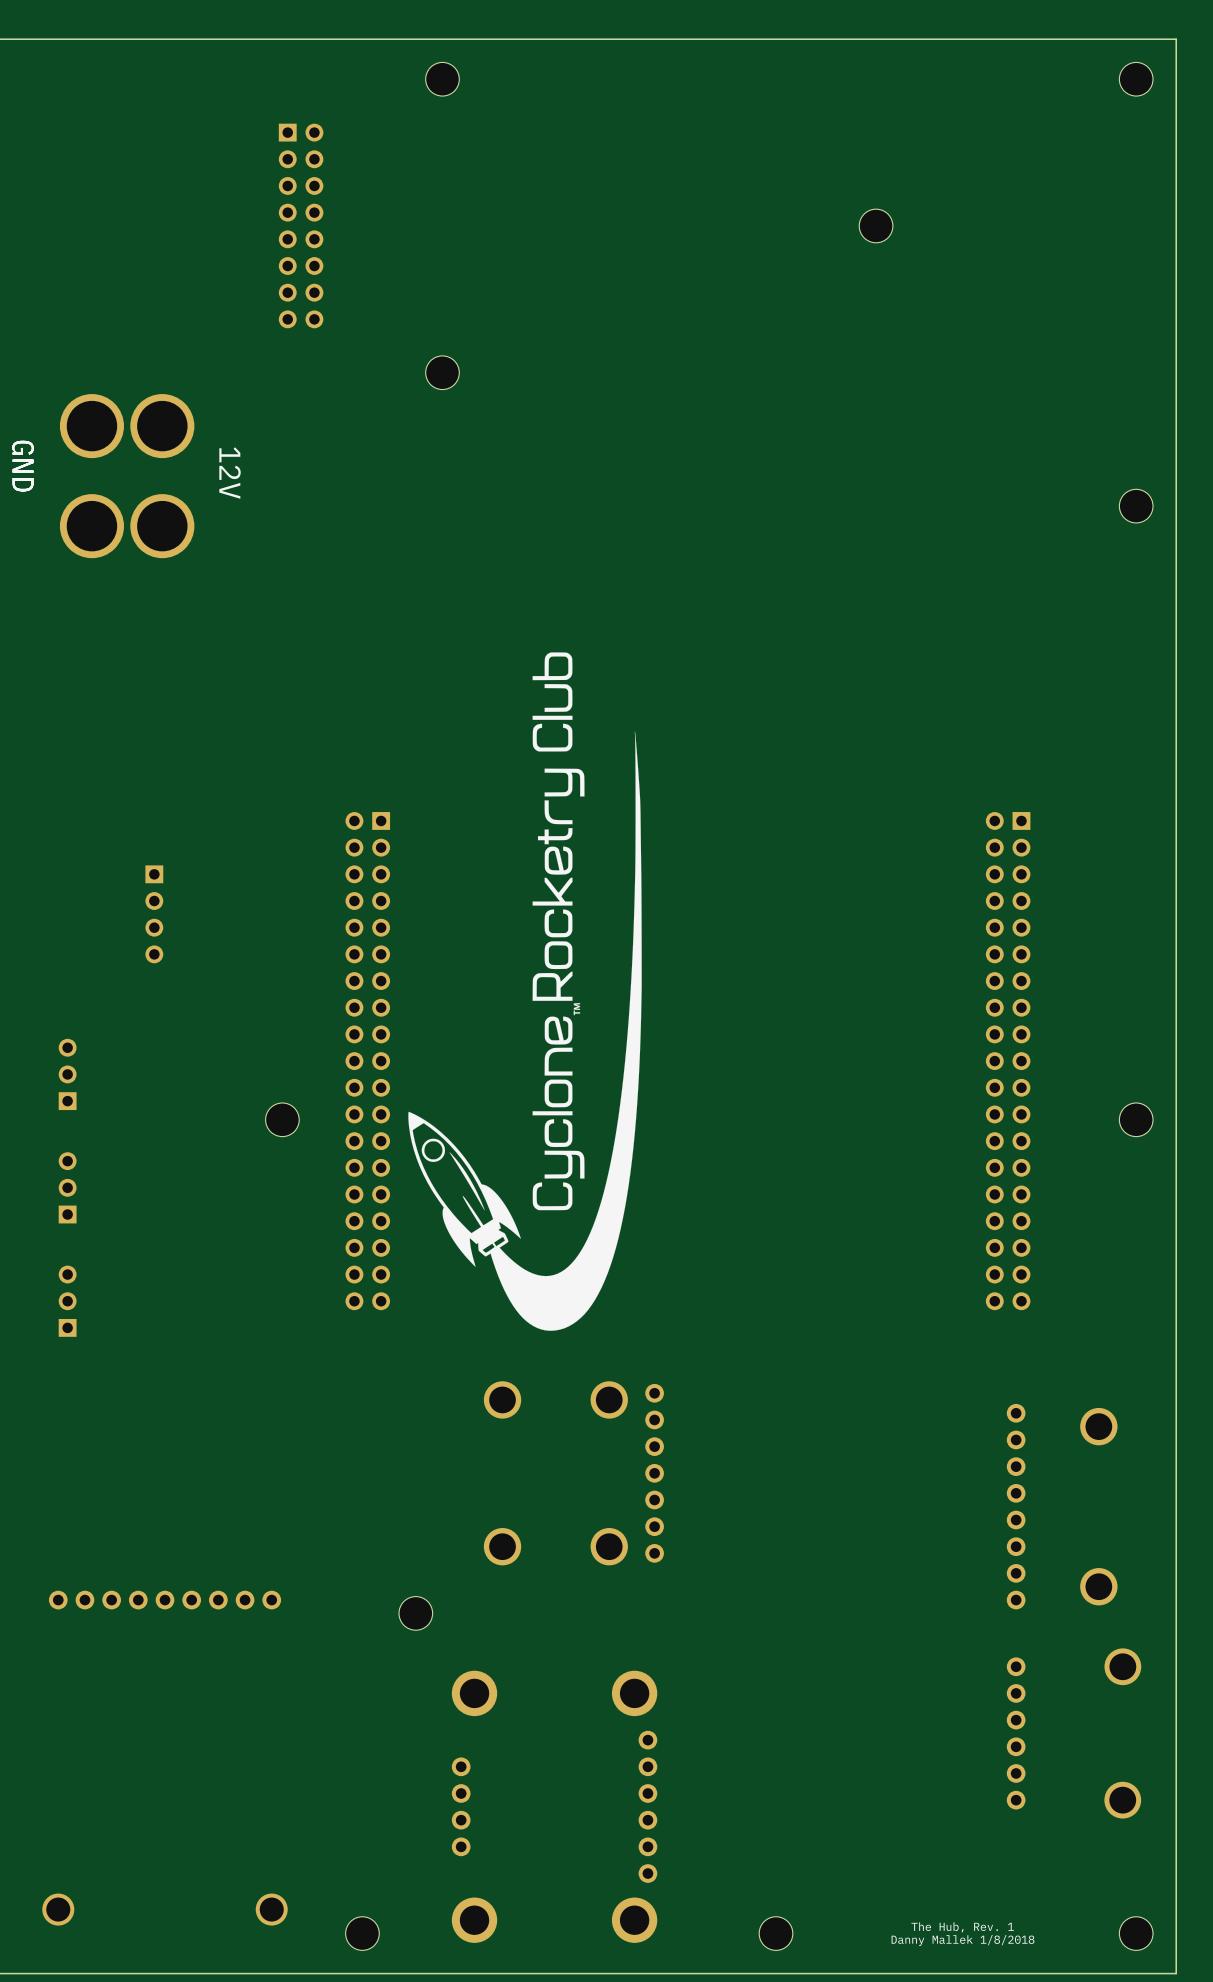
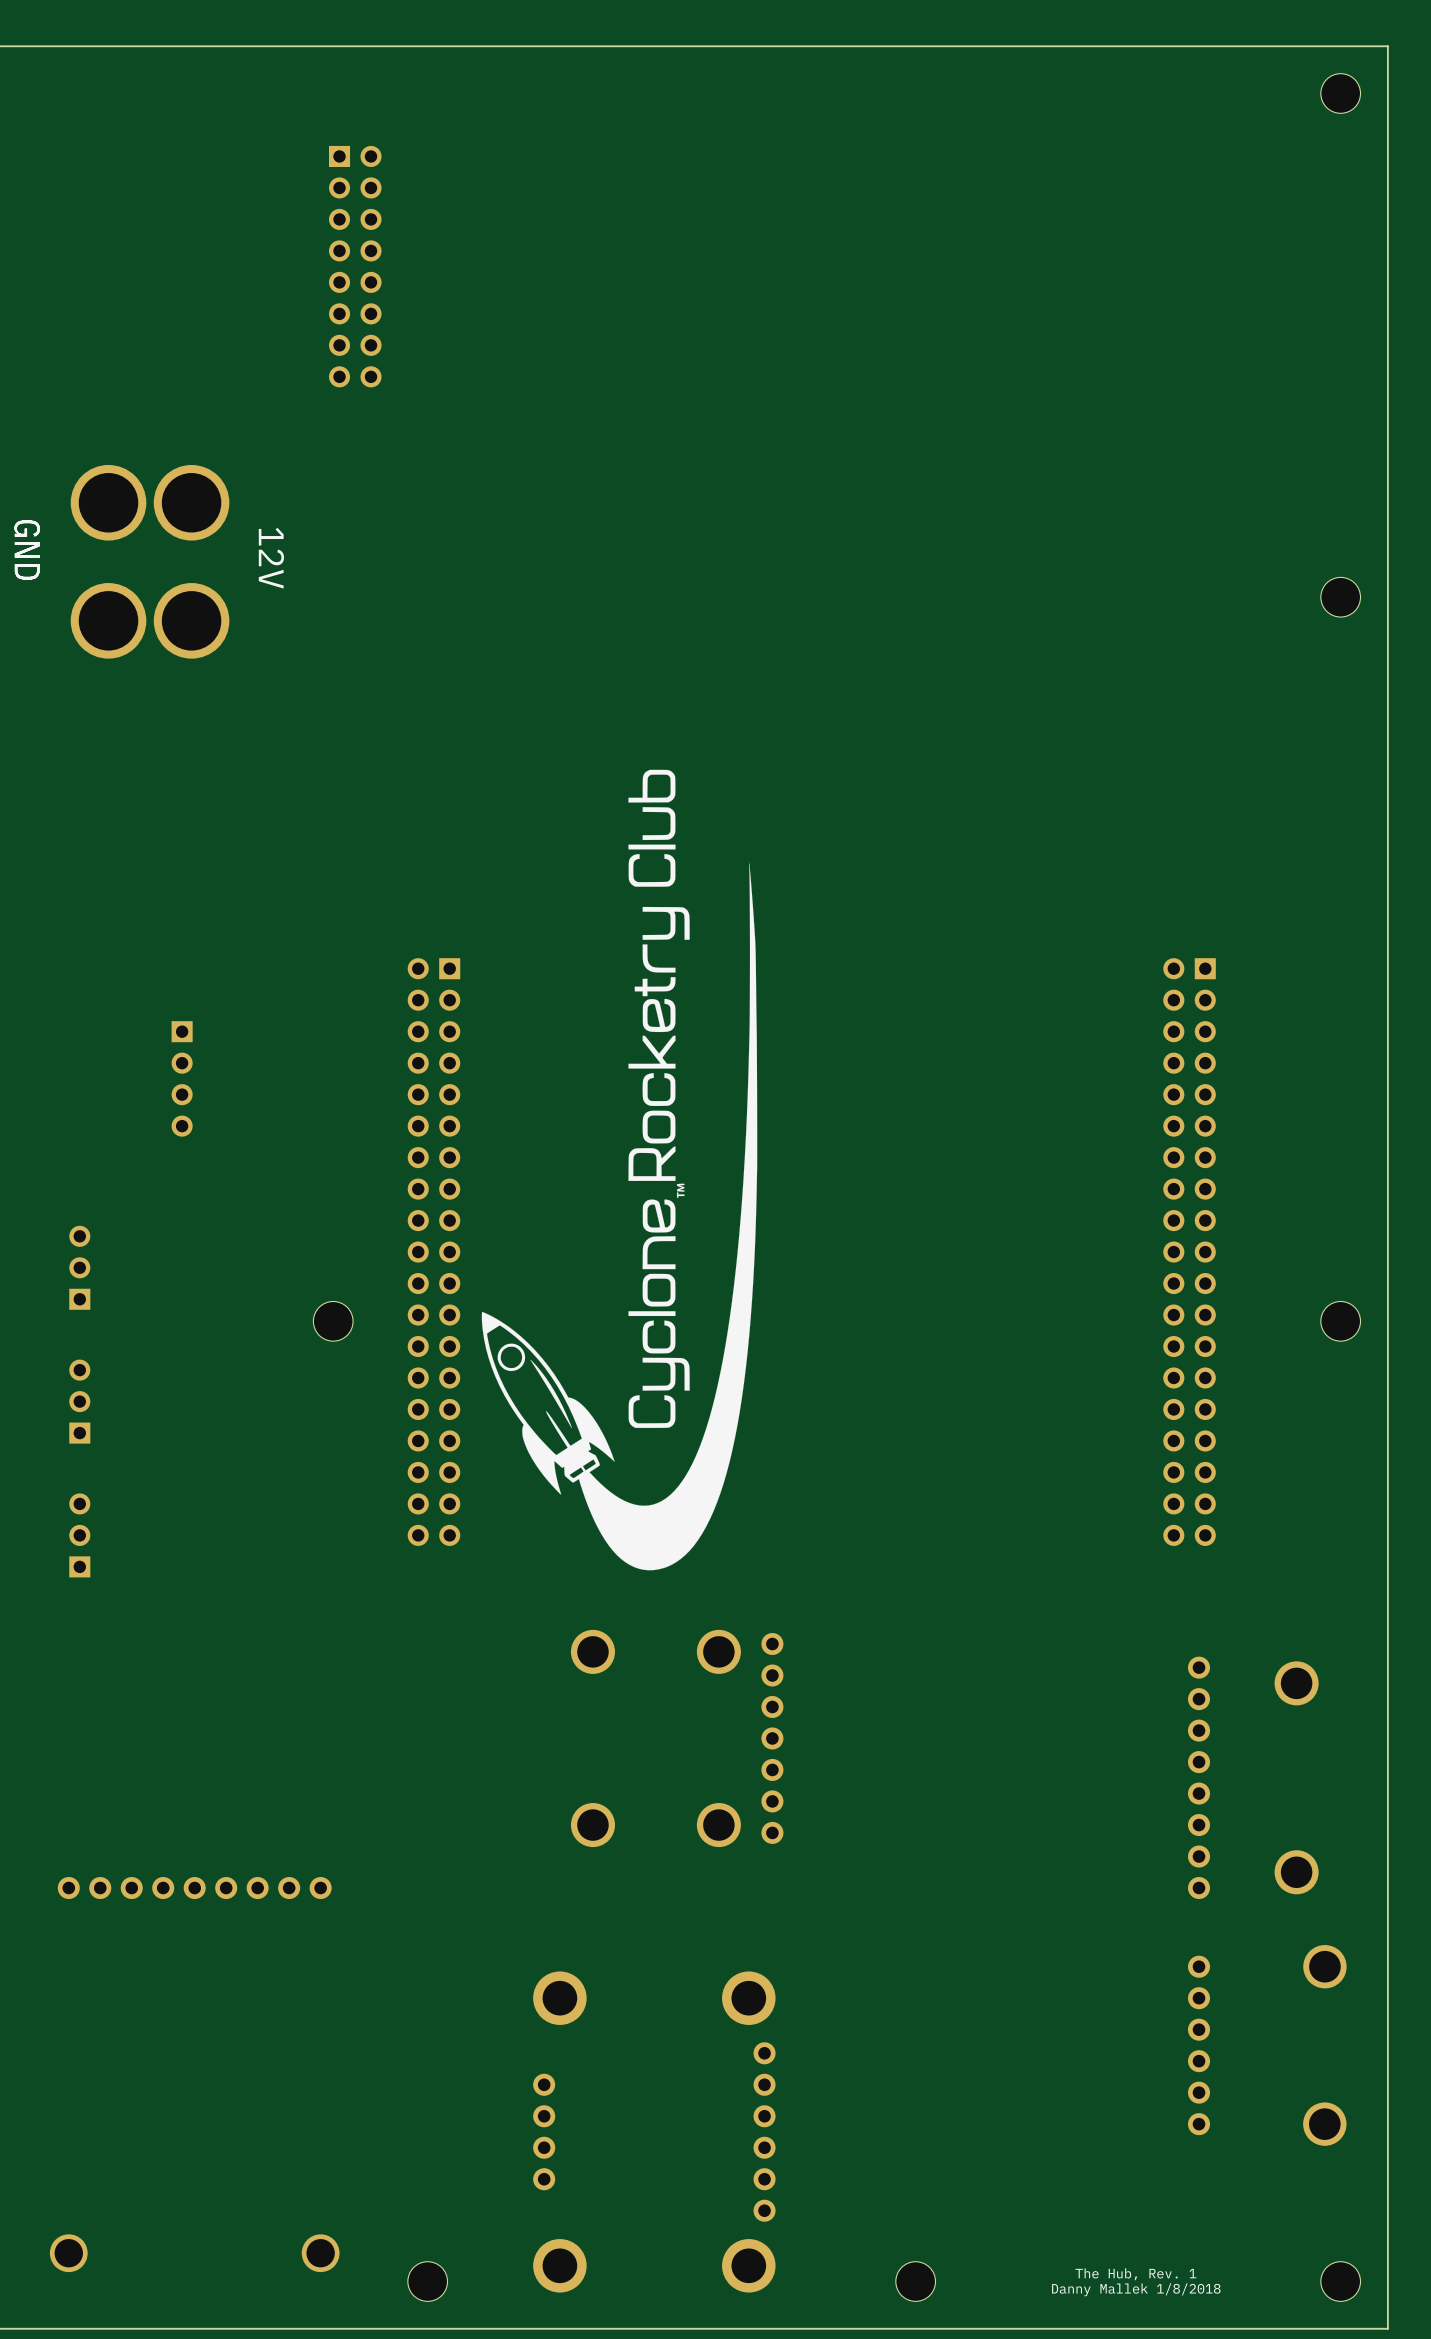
part: (442, 79) -> none
part: (876, 225) -> none
part: (442, 372) -> none
part: (415, 1613) -> none

